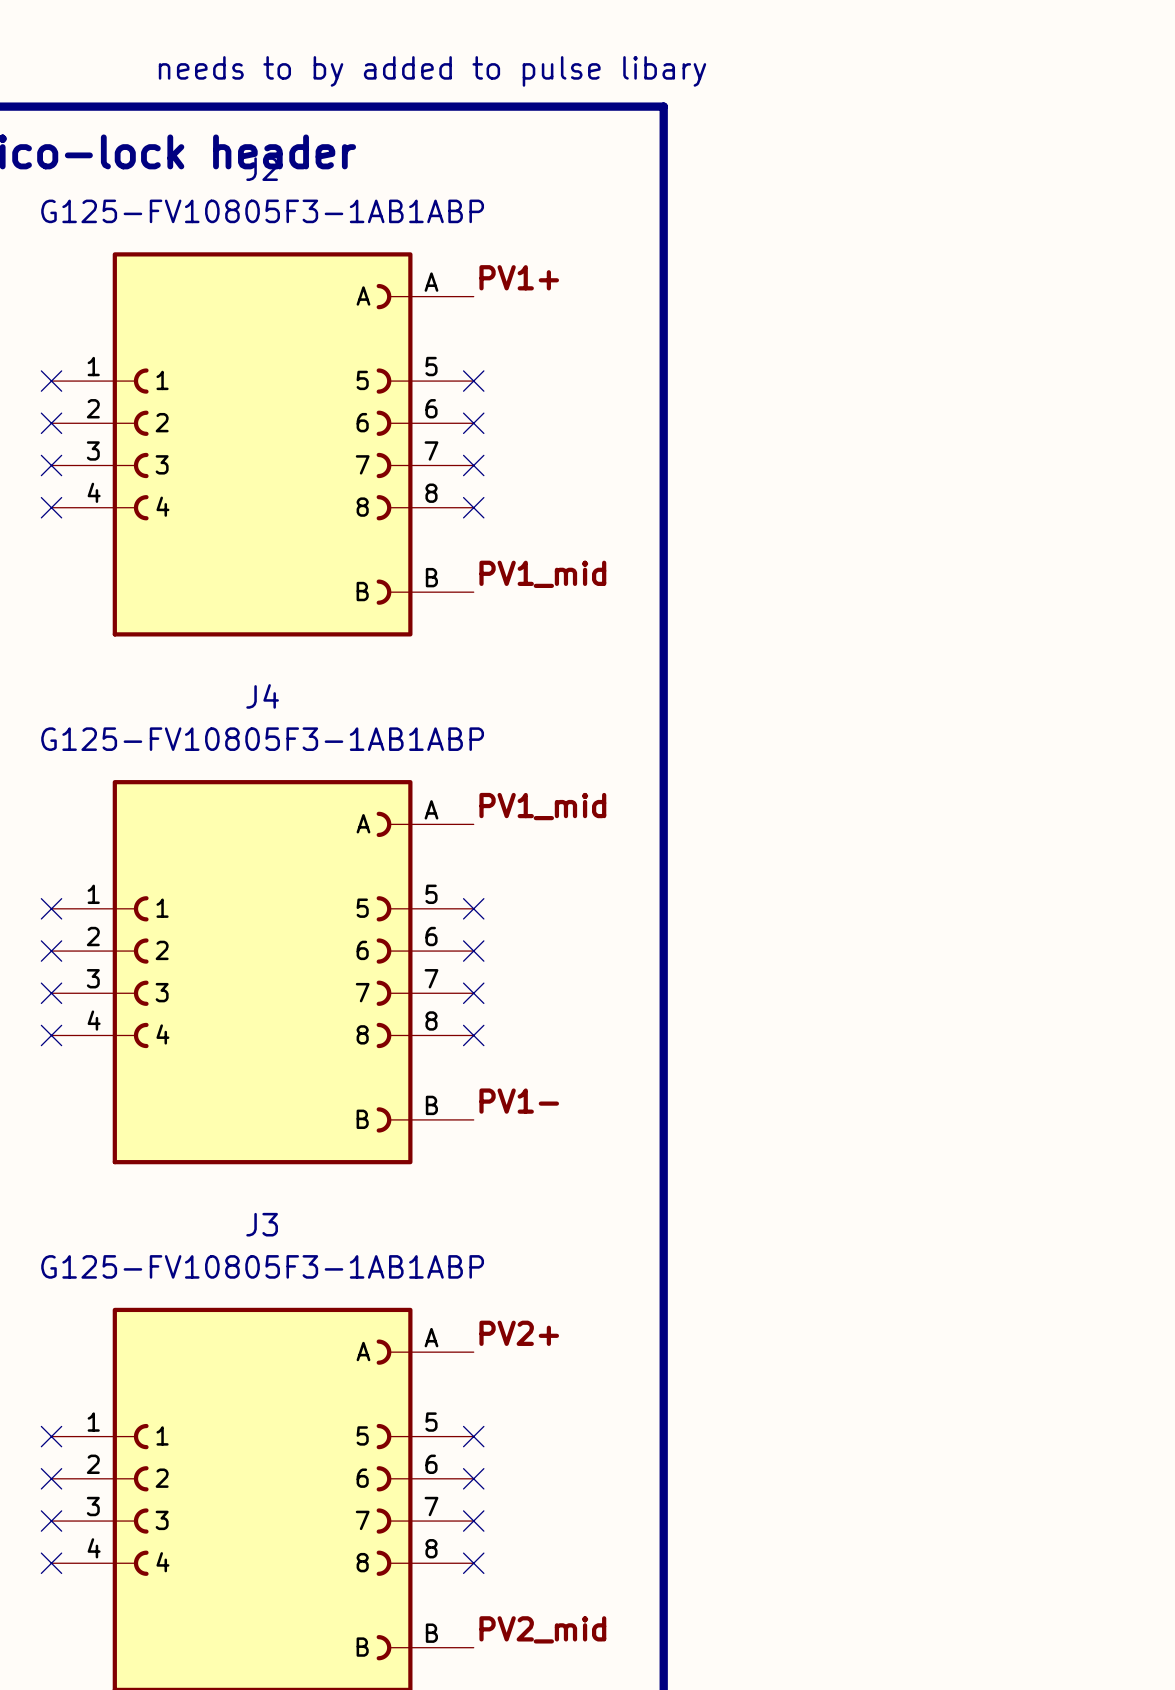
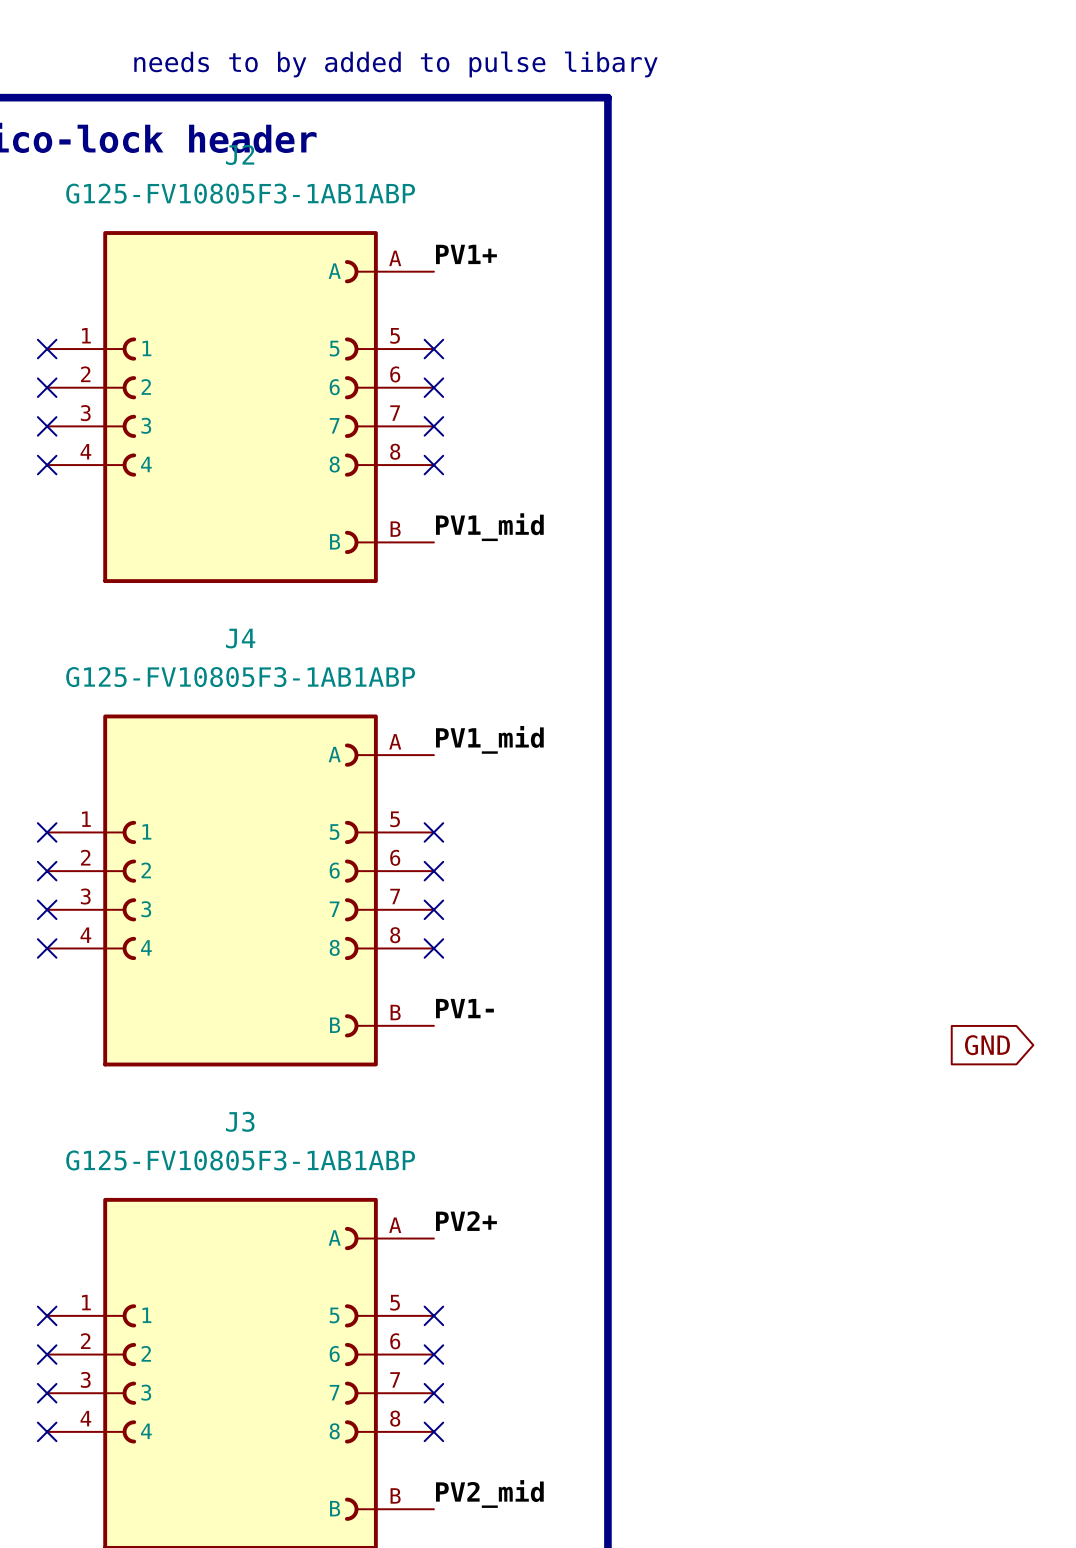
global label: none -> GND (987, 1045)

